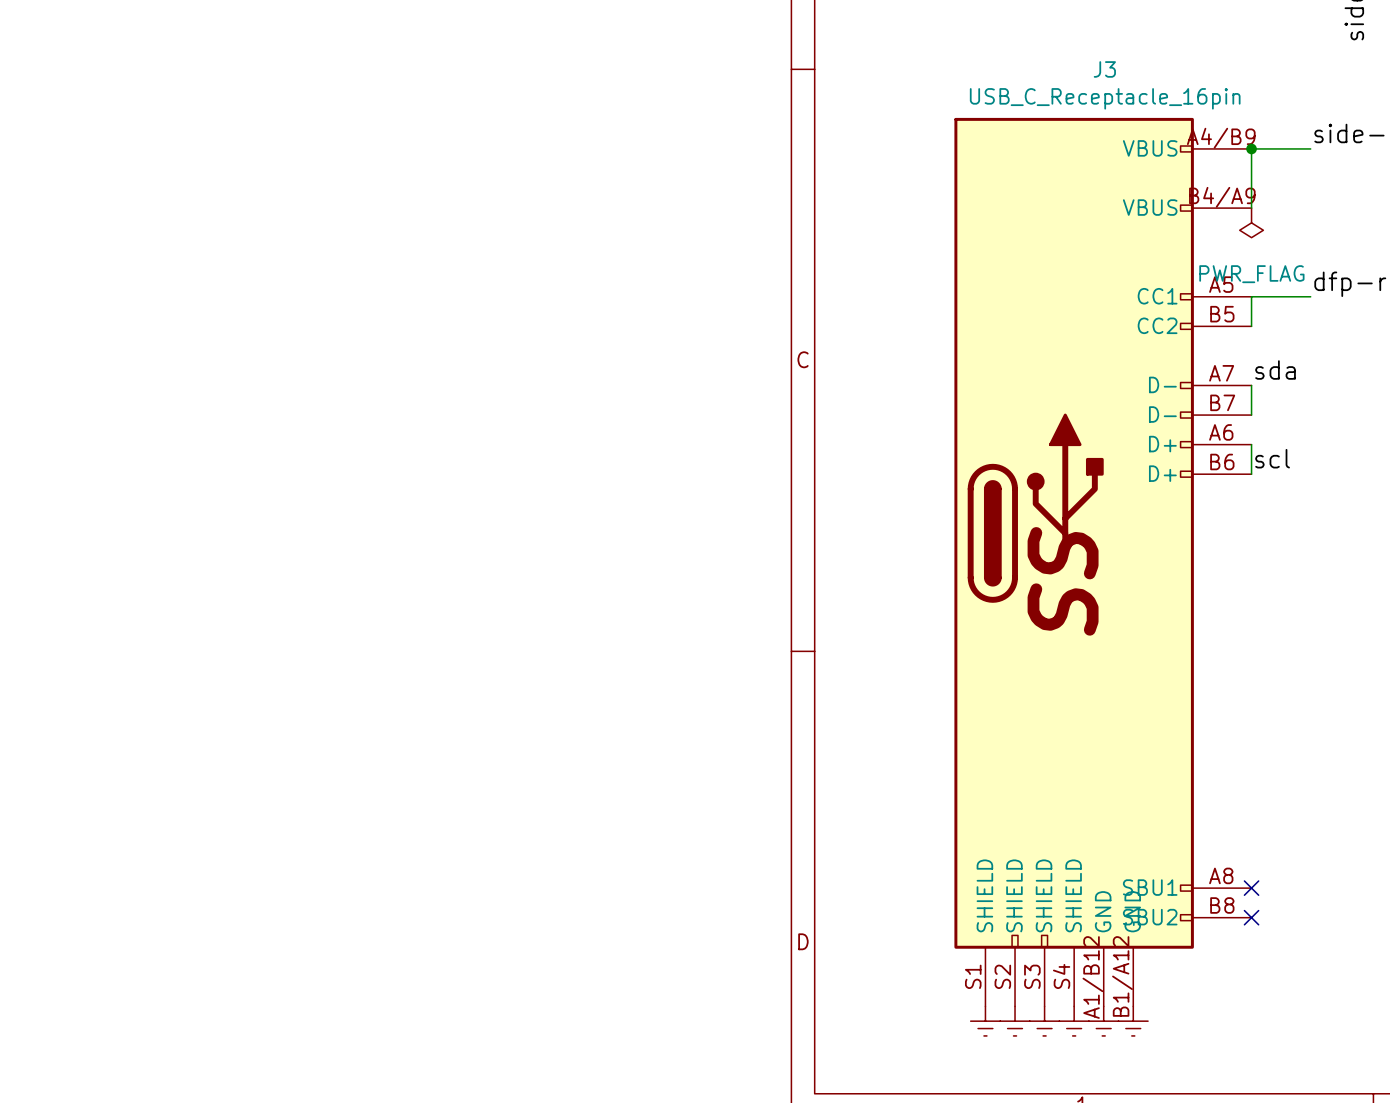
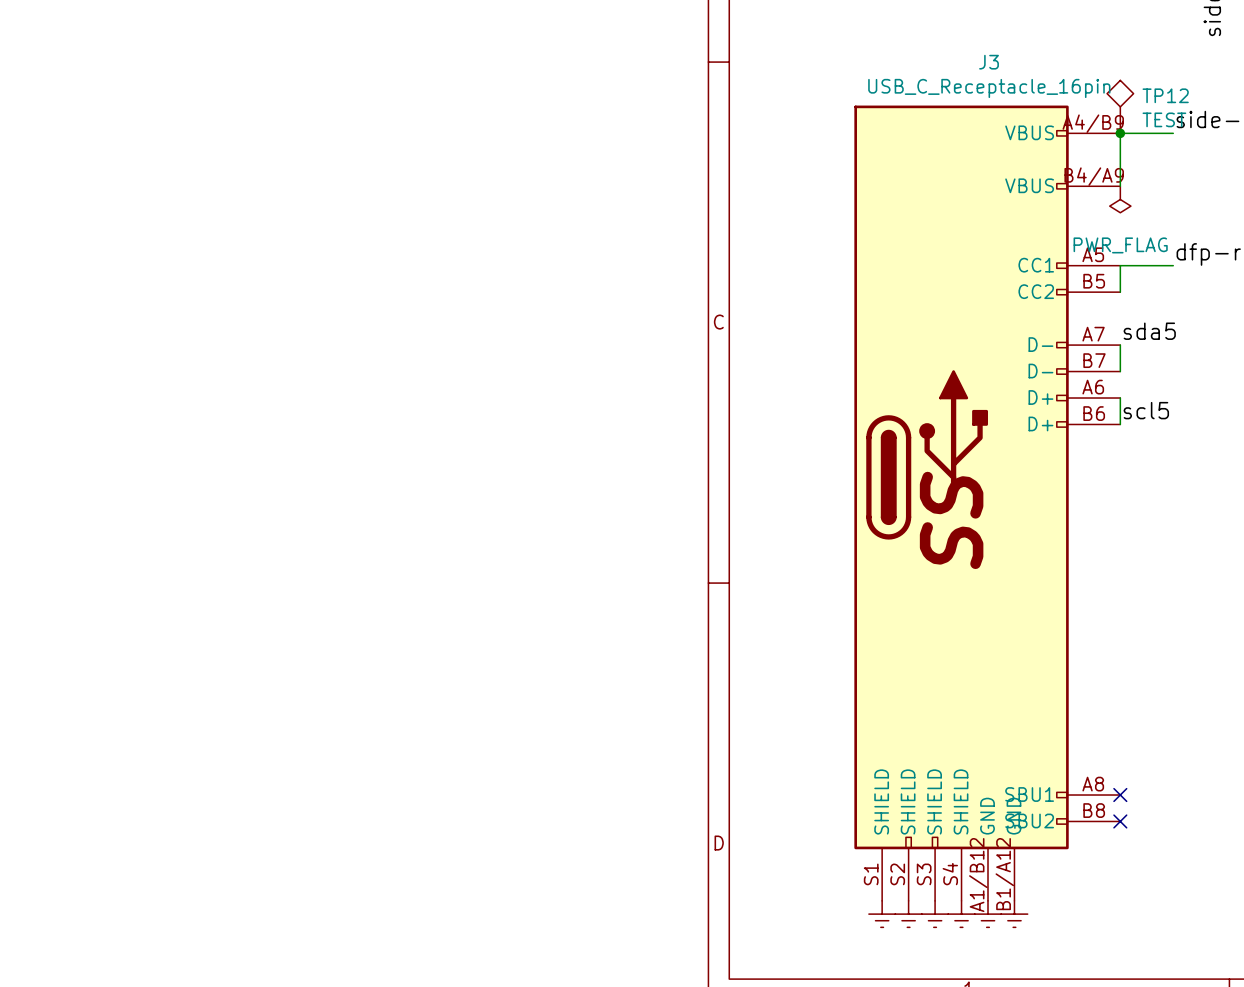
TP12: none -> TEST (1120, 106)
label: sda (1275, 370) -> sda5 (1149, 331)
label: scl (1272, 458) -> scl5 (1146, 410)

